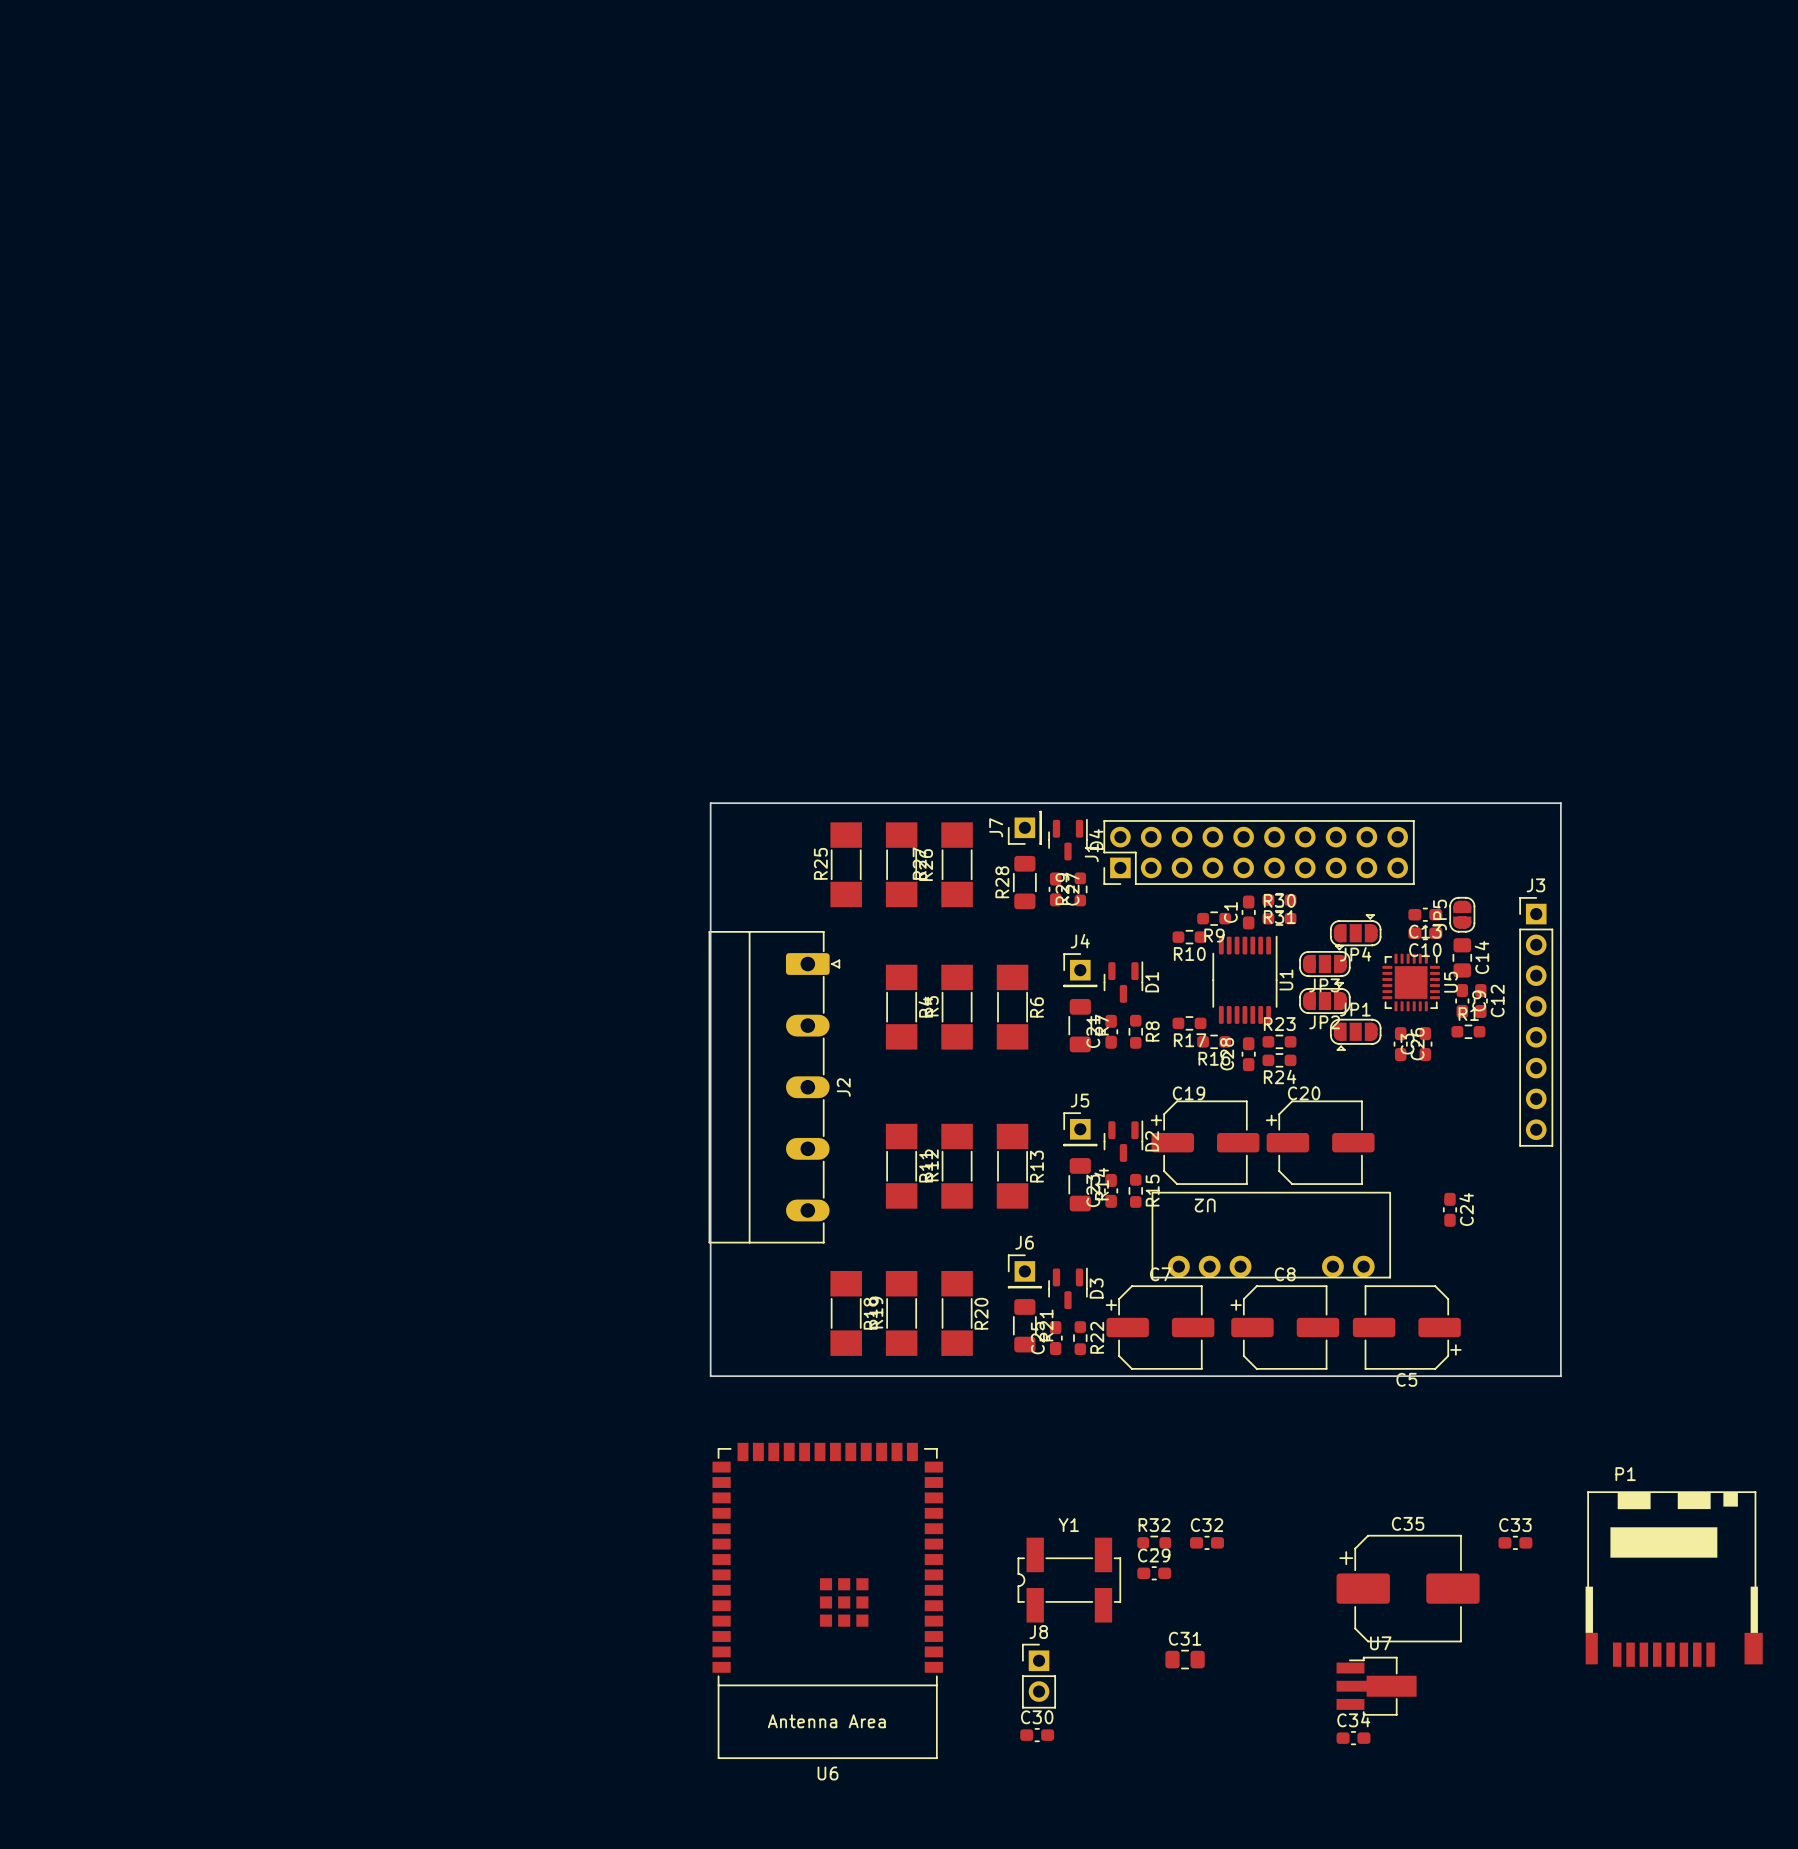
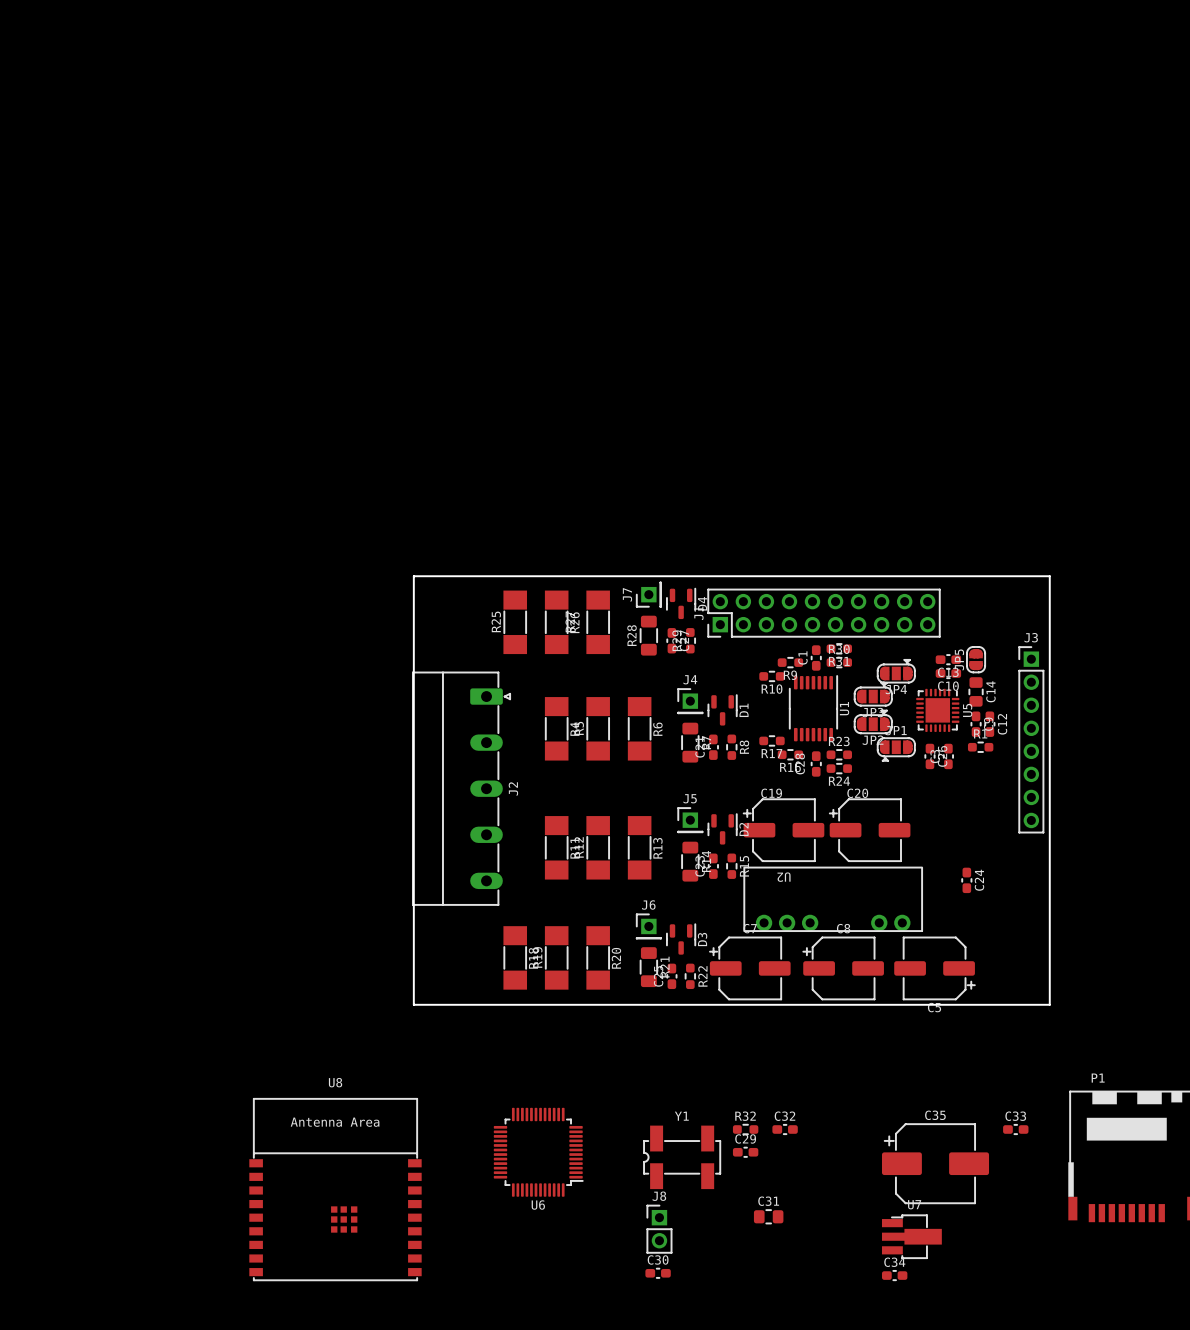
U6 footprint: [712, 1442, 943, 1759] -> [493, 1107, 584, 1197]
U8: none -> (335, 1189)
U6 name position: U6 (827, 1773) -> U6 (538, 1205)

